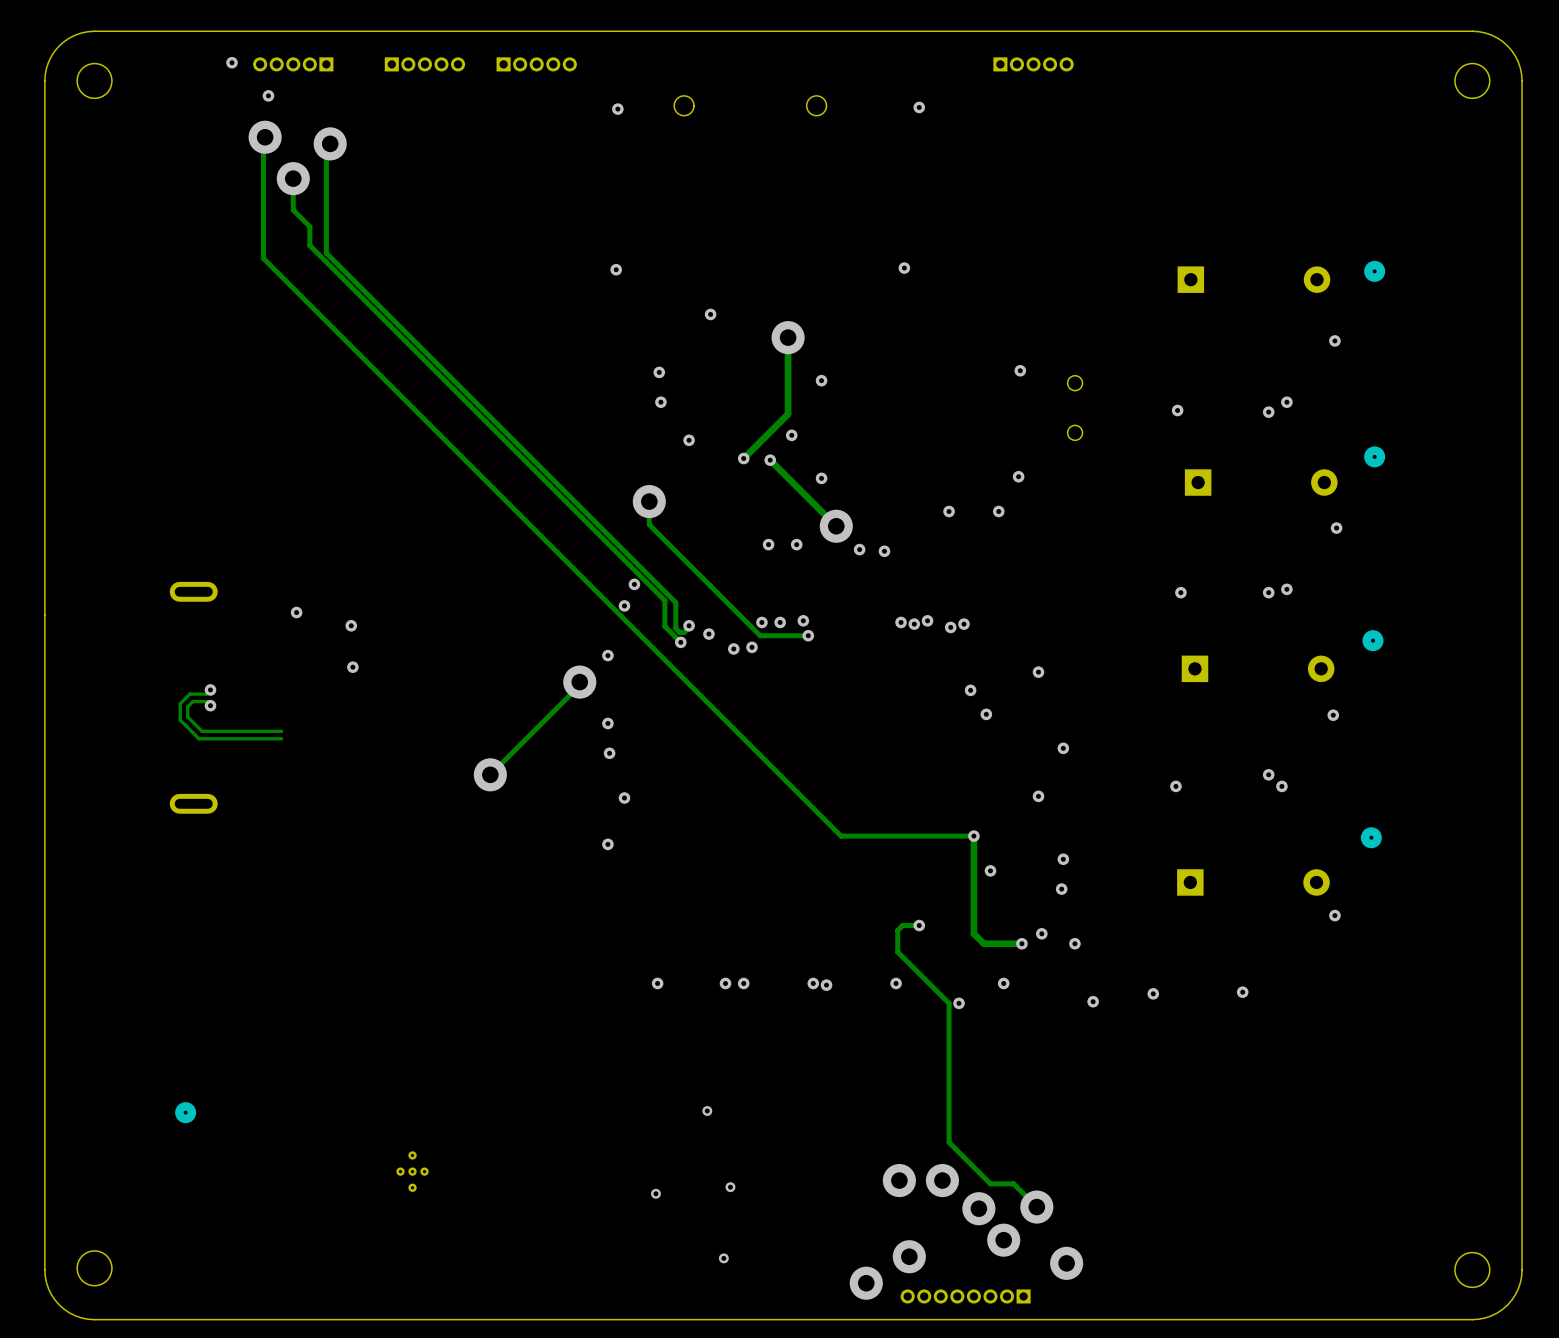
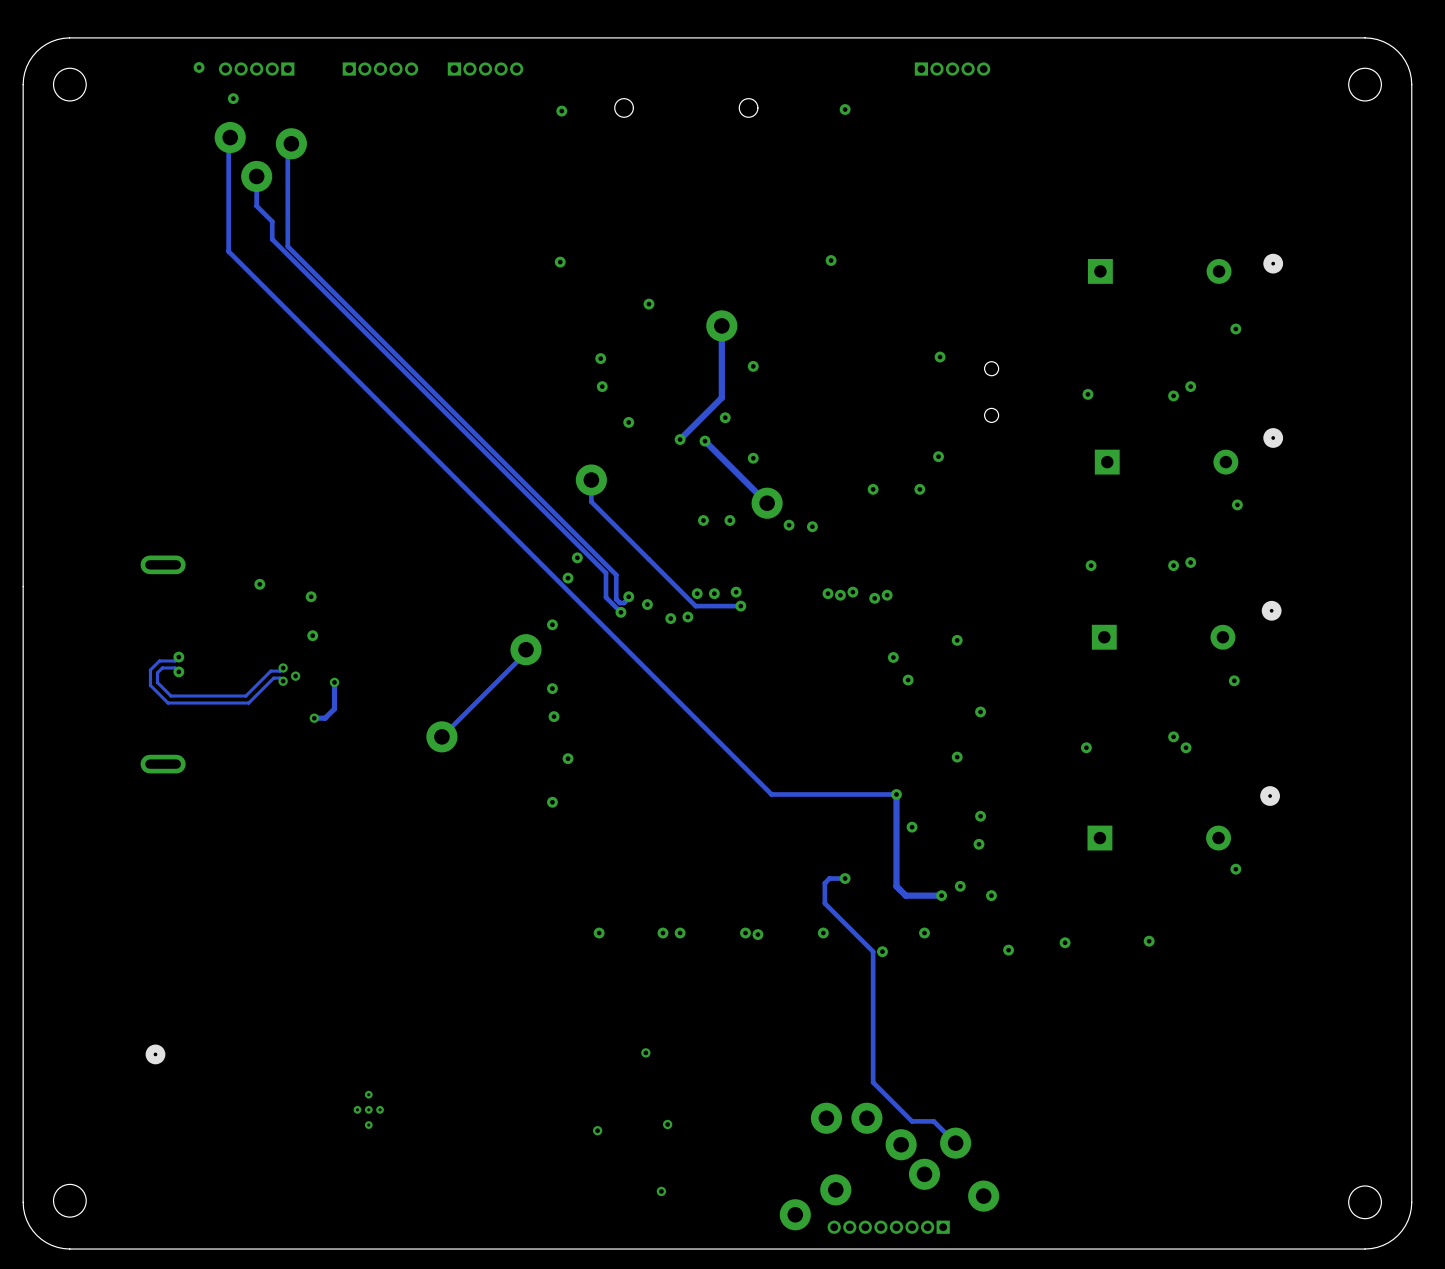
track: none -> (283, 667) (280, 671) (270, 671) (245, 696)
via: none -> (283, 667)
via: none -> (295, 676)
track: none -> (283, 681) (280, 678) (273, 678) (248, 703) (245, 703)
via: none -> (283, 681)
track: none -> (334, 682) (334, 708) (325, 718) (314, 718)
via: none -> (334, 682)
via: none -> (314, 718)

